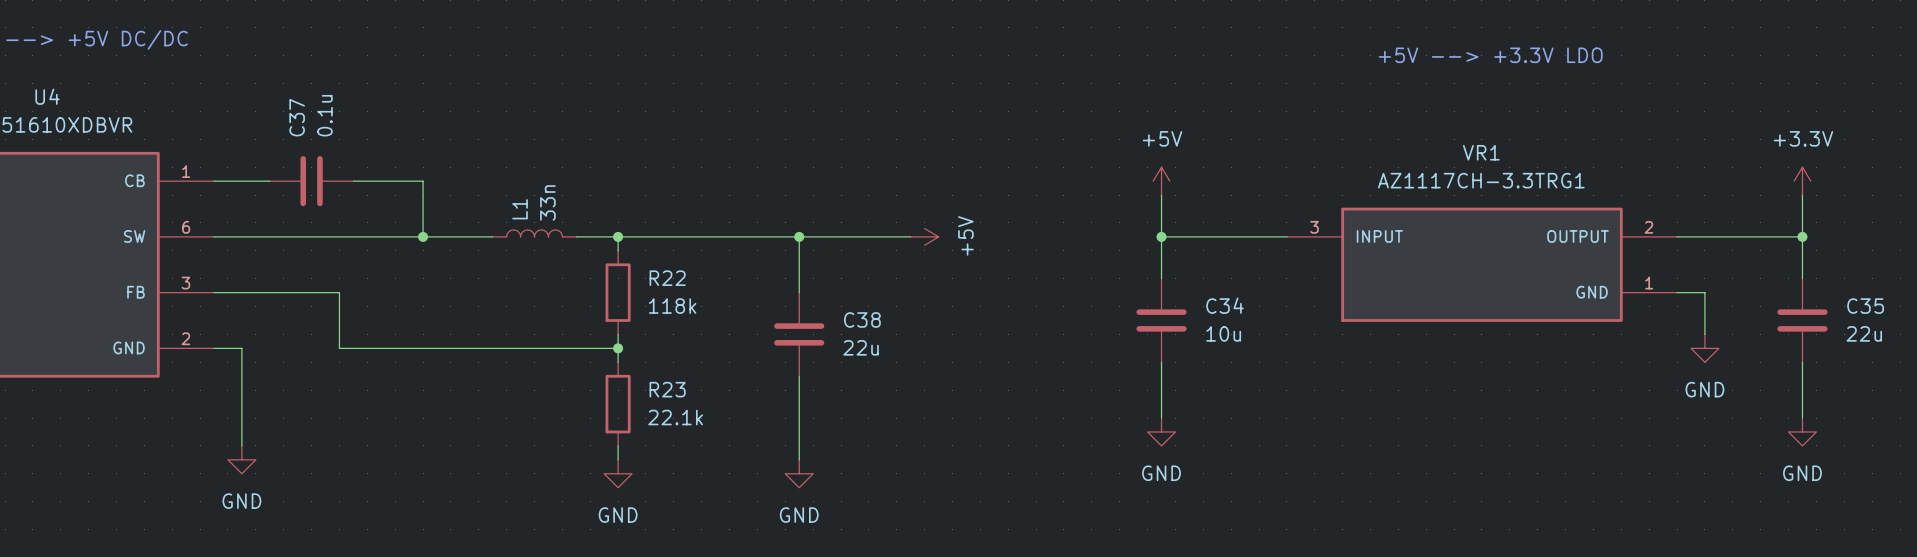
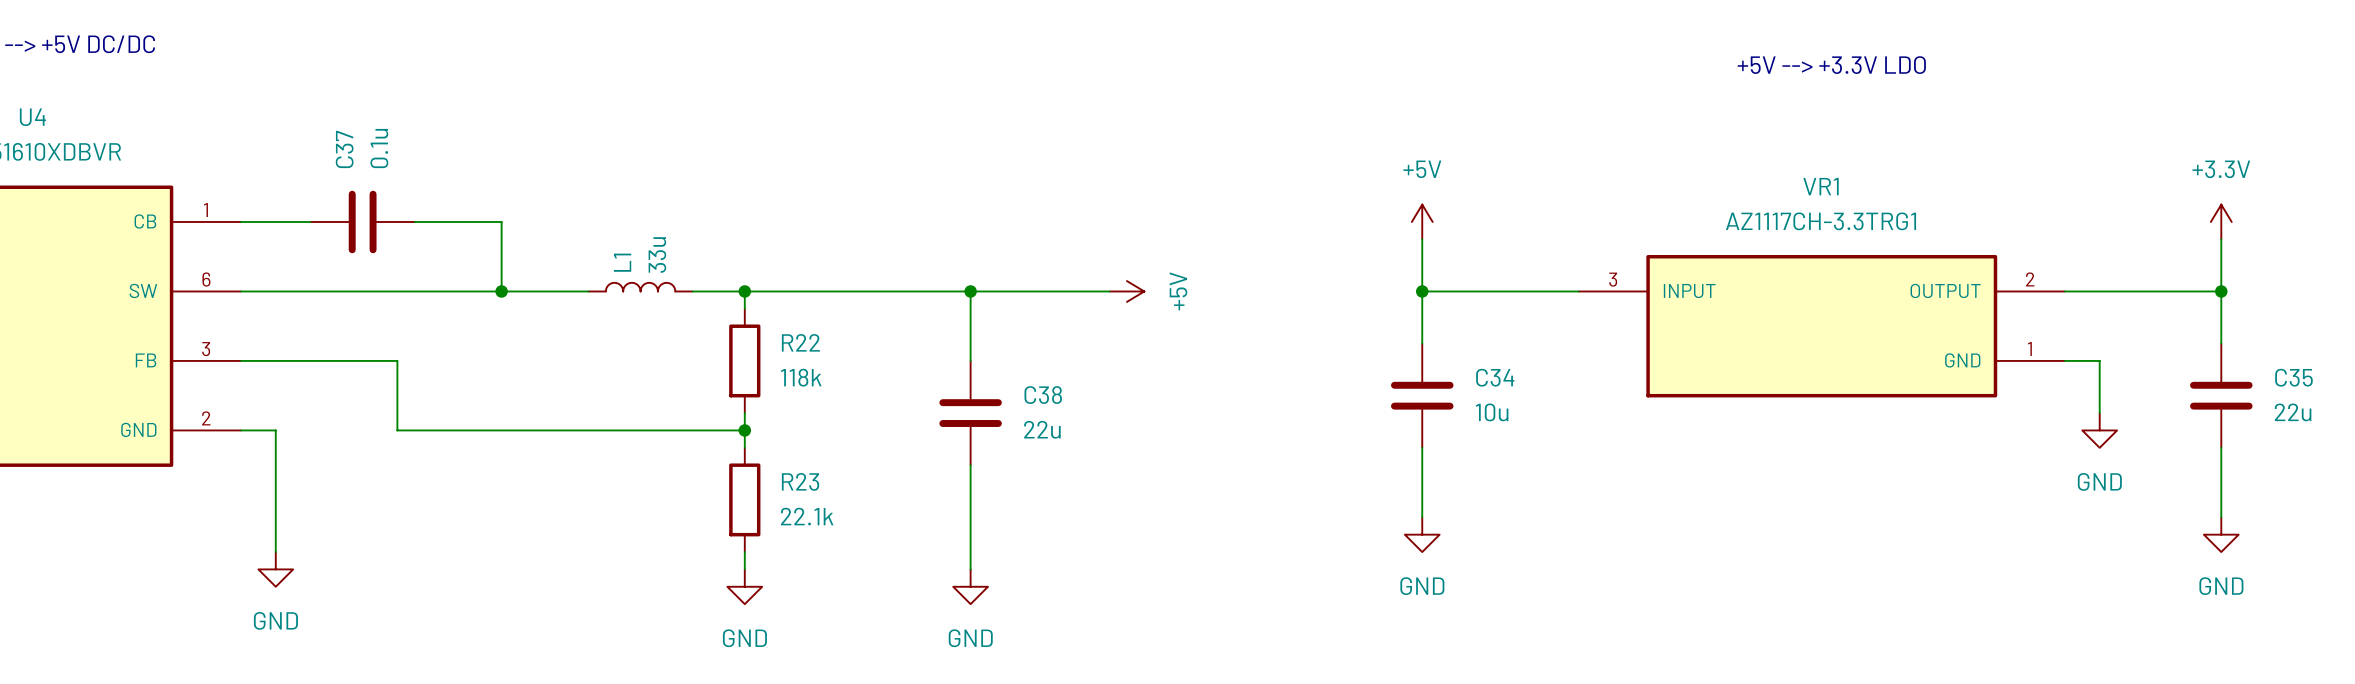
L1 value: 33n (547, 202) -> 33u (657, 255)

